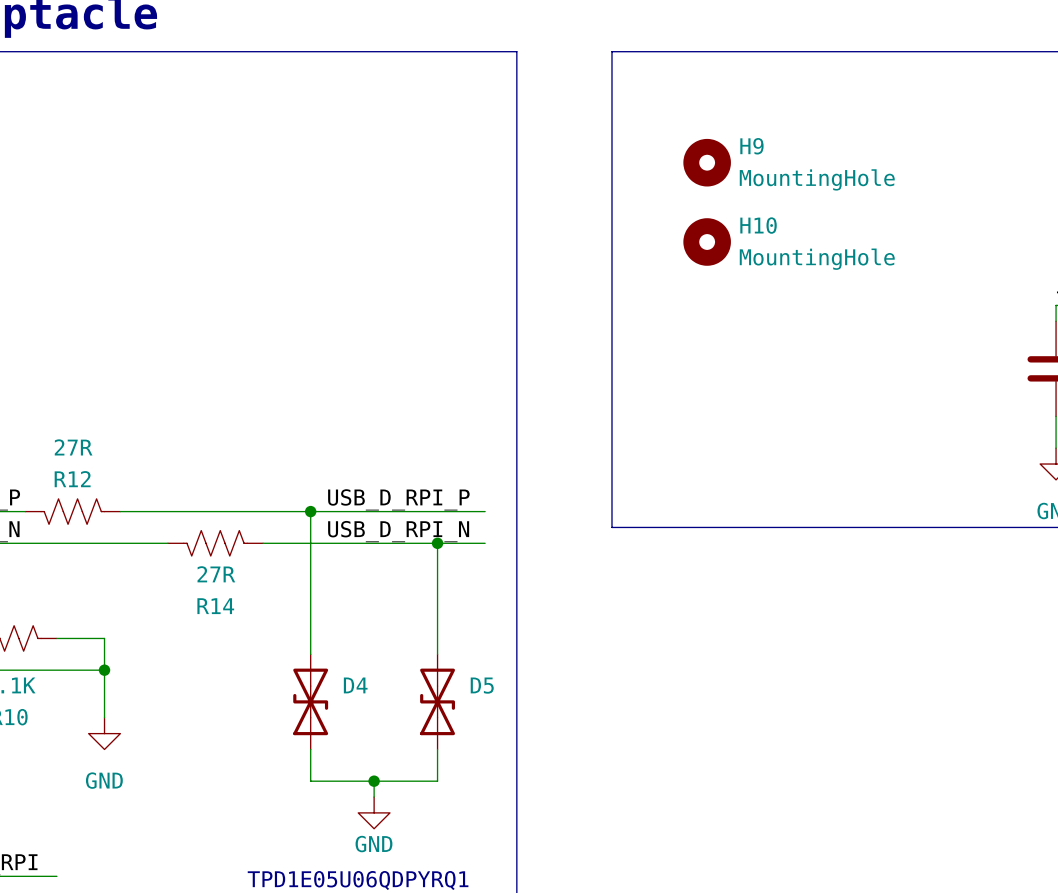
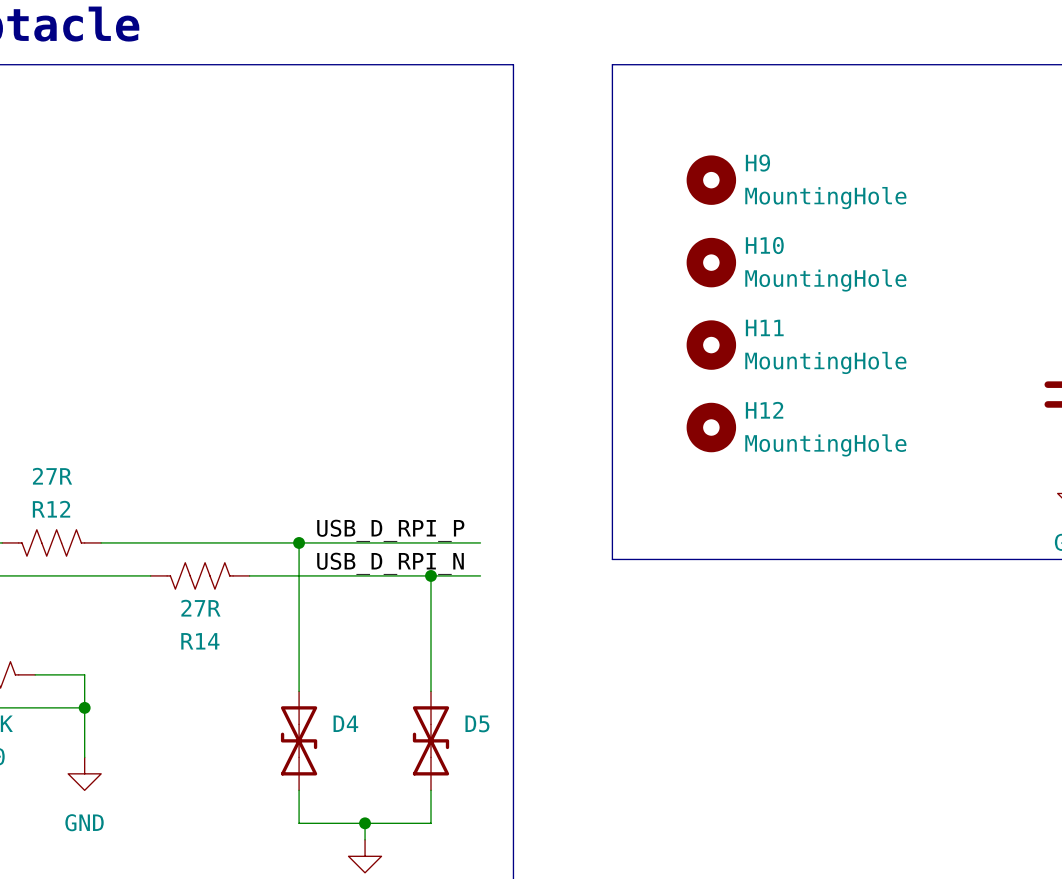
H11: none -> MountingHole (711, 345)
H12: none -> MountingHole (711, 427)

